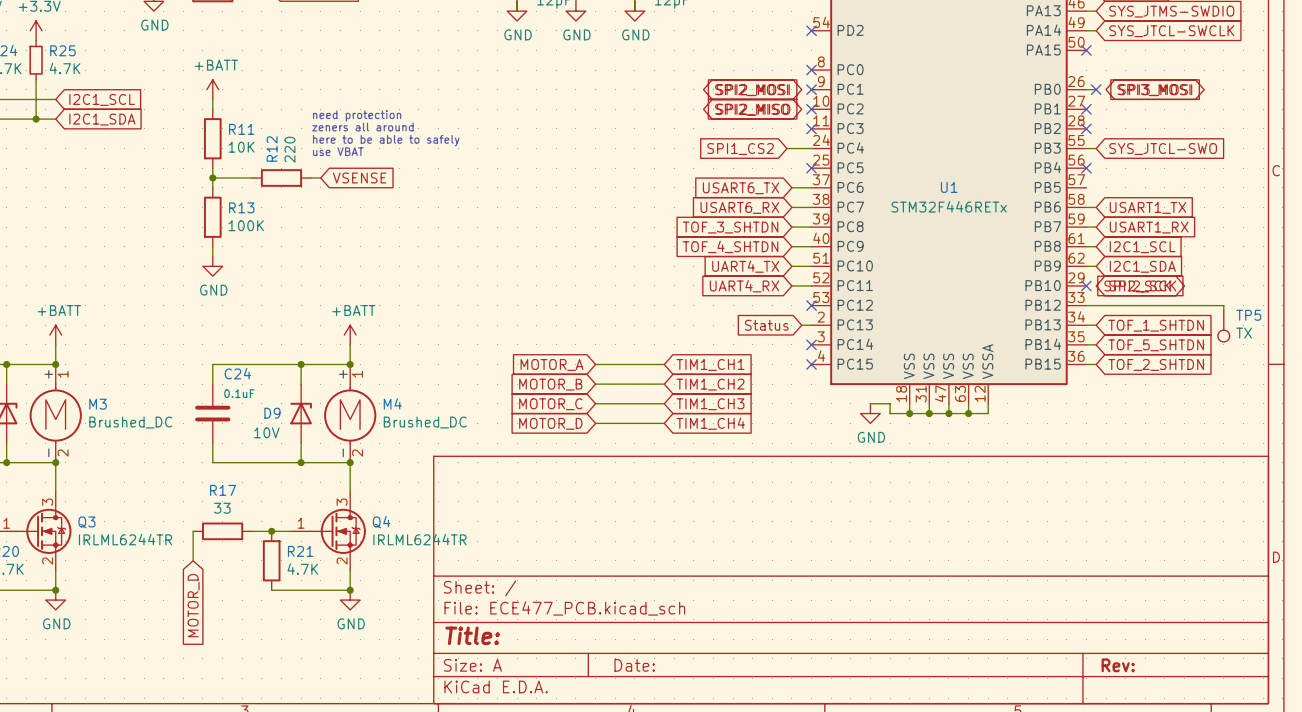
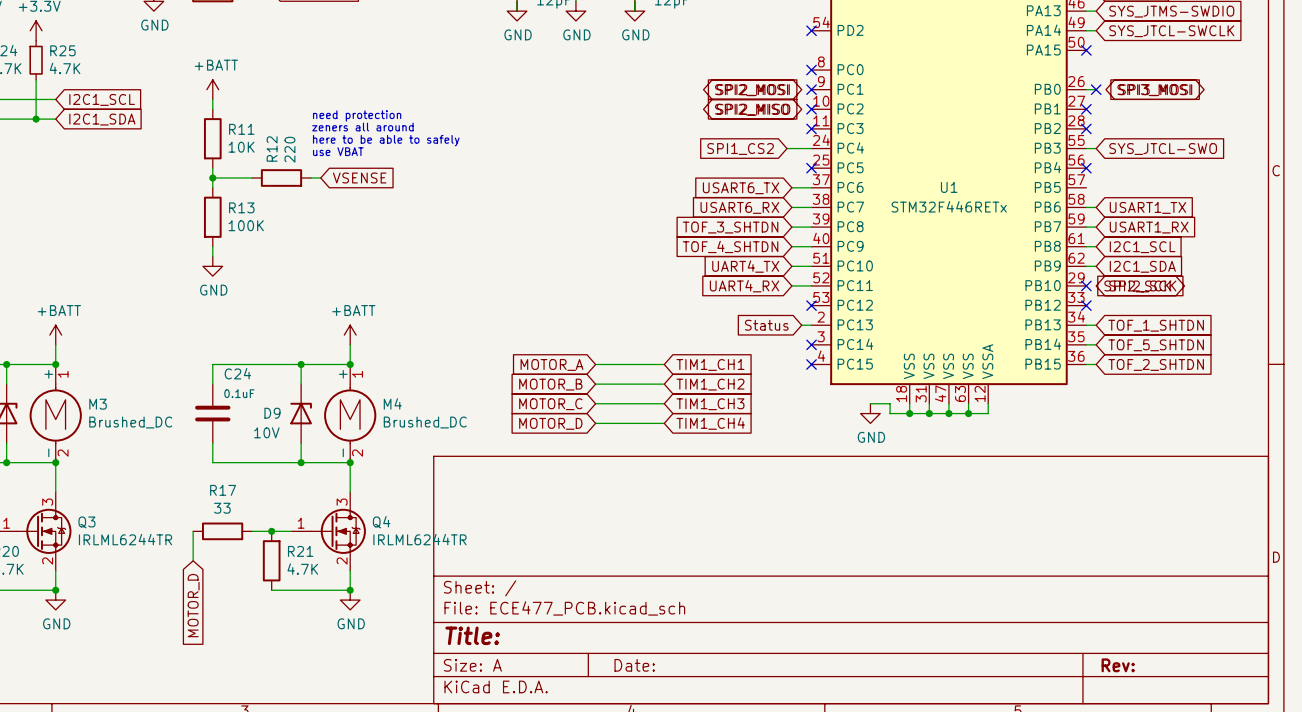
wire: (1086, 305) (1223, 305) (1223, 310) -> none
no-connect mark: none -> (1086, 305)
TP5: TX (1223, 326) -> none

